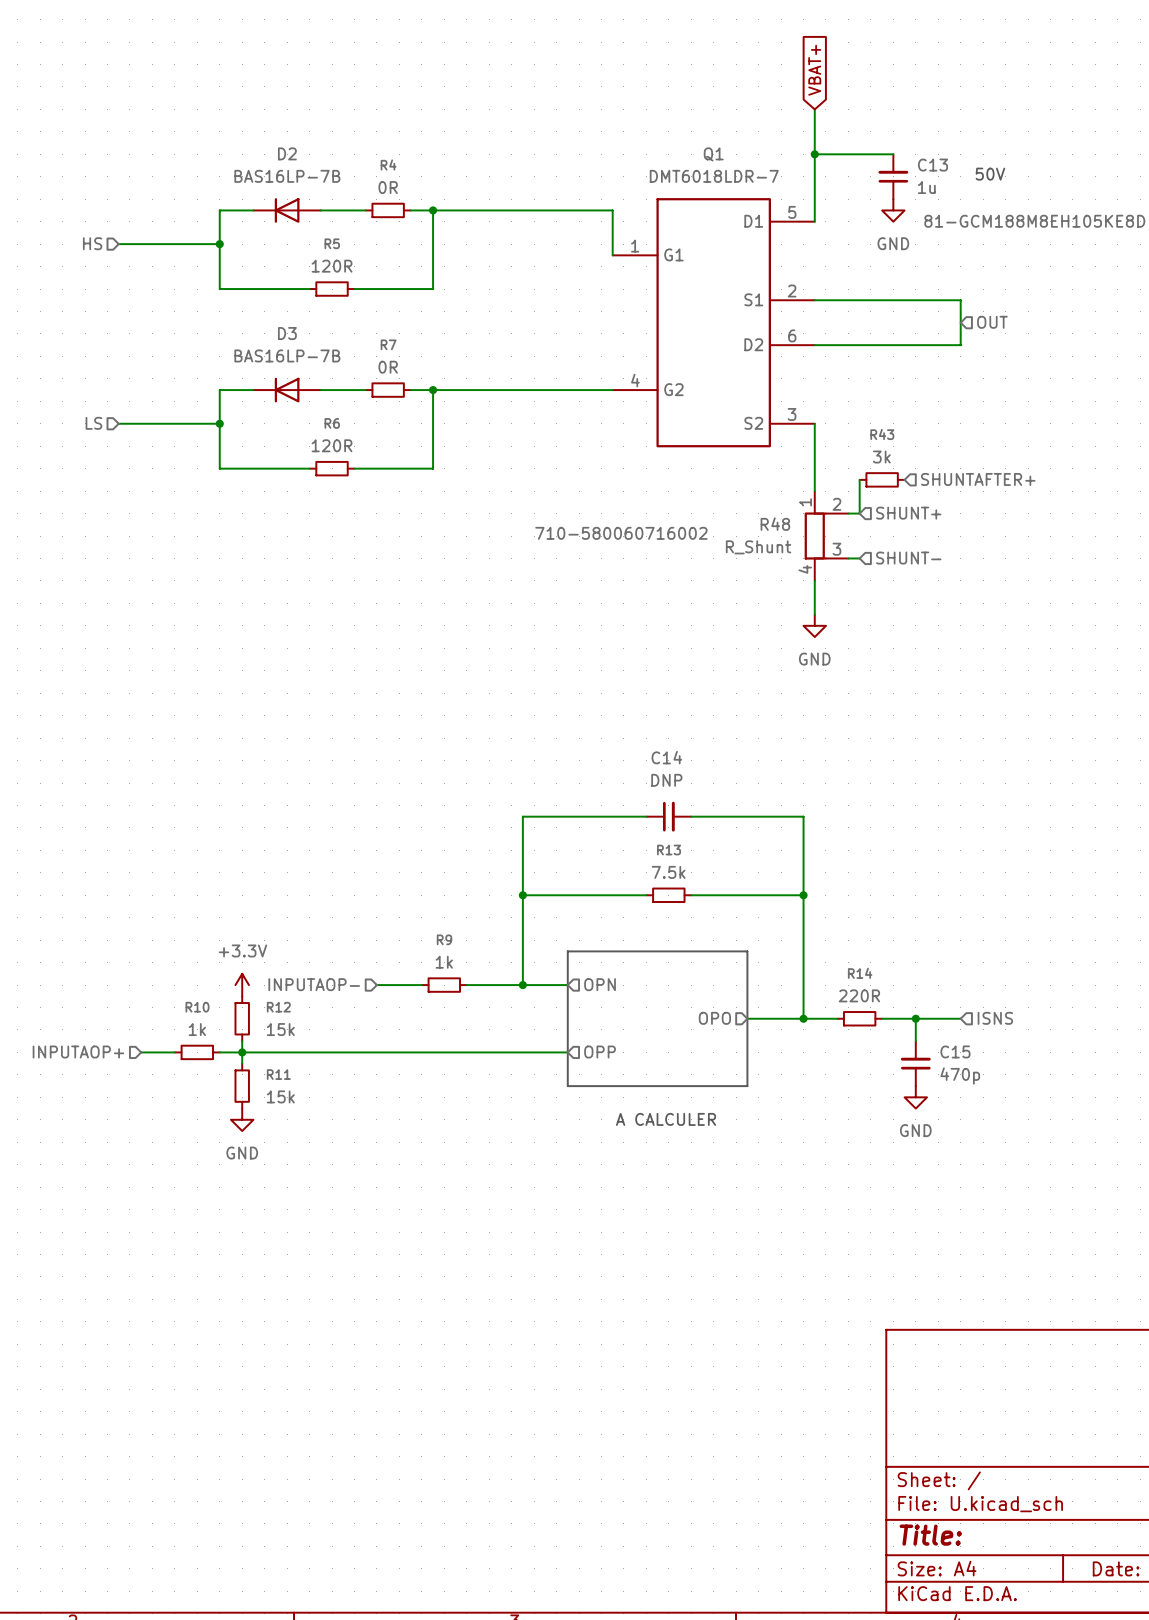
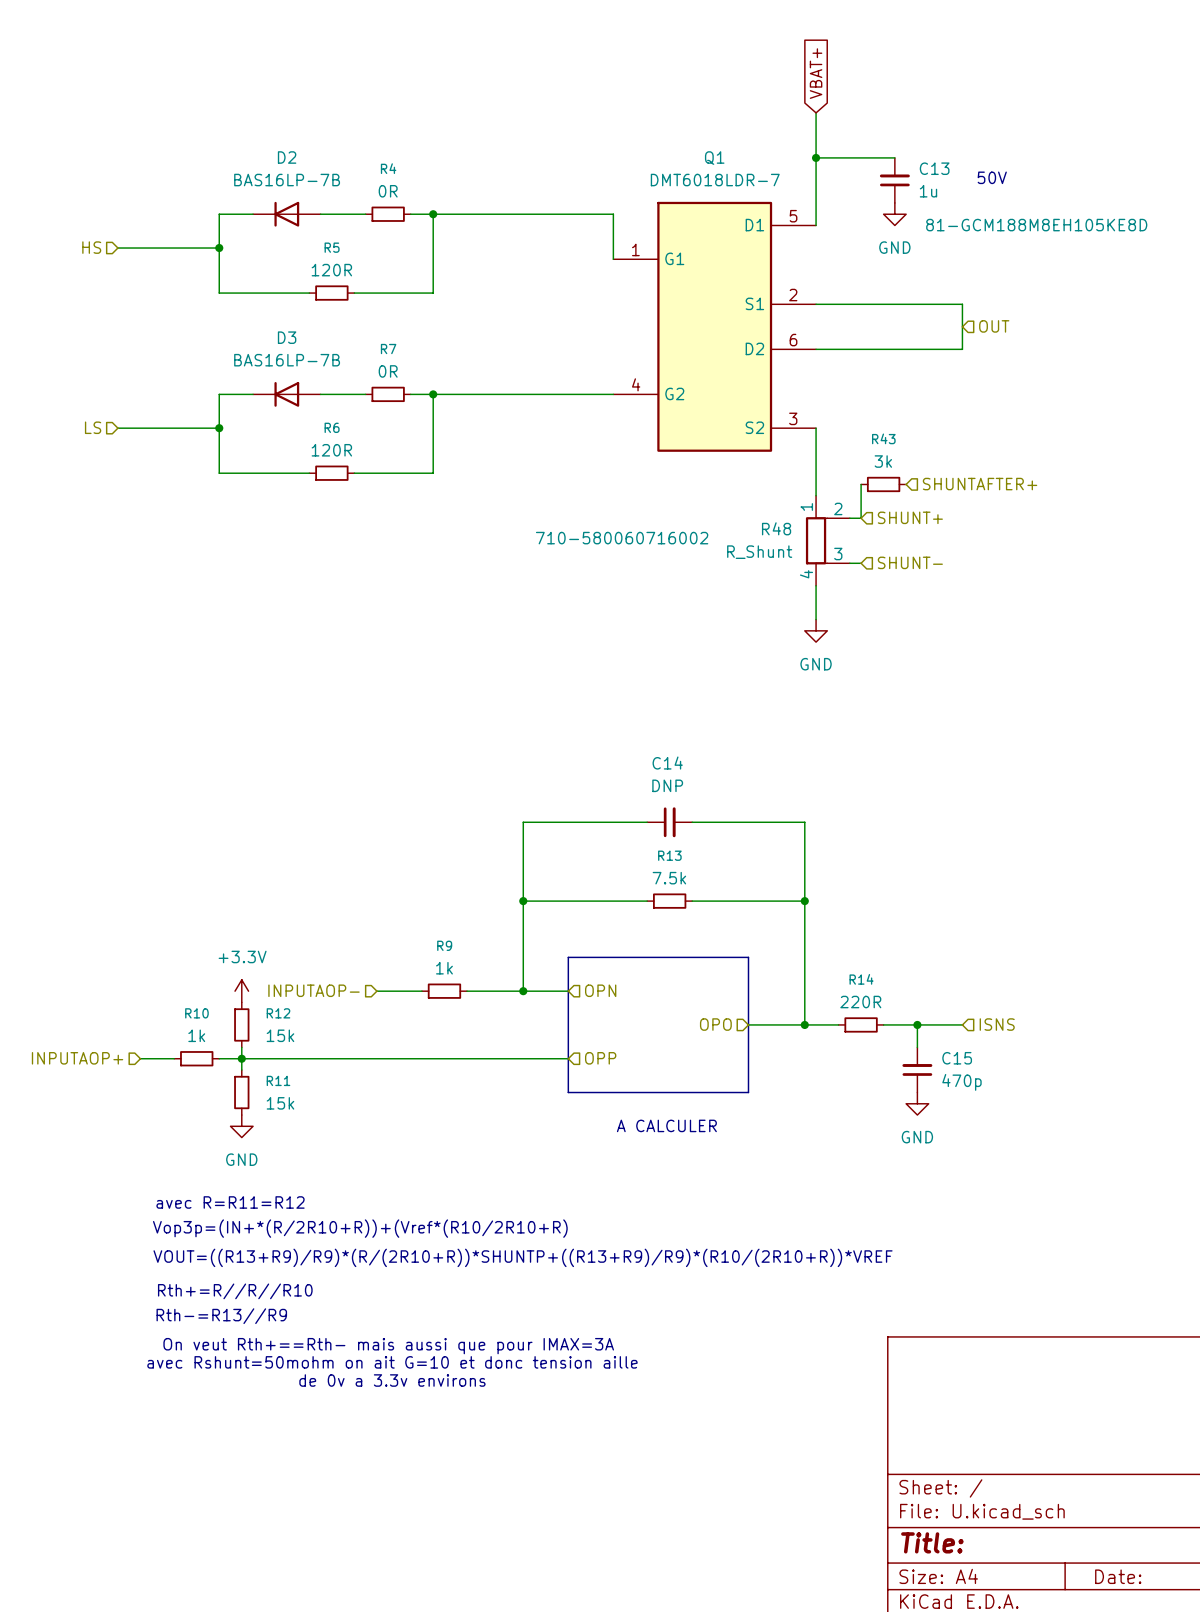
text: none -> avec R=R11=R12 (230, 1202)
text: none -> Vop3p=(IN+*(R/2R10+R))+(Vref*(R10/2R10+R) (360, 1228)
text: none -> VOUT=((R13+R9)/R9)*(R/(2R10+R))*SHUNTP+((R13+R9)/R9)*(R10/(2R10+R))*VREF (523, 1257)
text: none -> Rth+=R//R//R10 (235, 1291)
text: none -> Rth-=R13//R9 (221, 1316)
text: none -> On veut Rth+==Rth- mais aussi que pour IMAX=3A (388, 1346)
text: none -> avec Rshunt=50mohm on ait G=10 et donc tension aille (392, 1362)
text: none -> de 0v a 3.3v environs (392, 1380)

